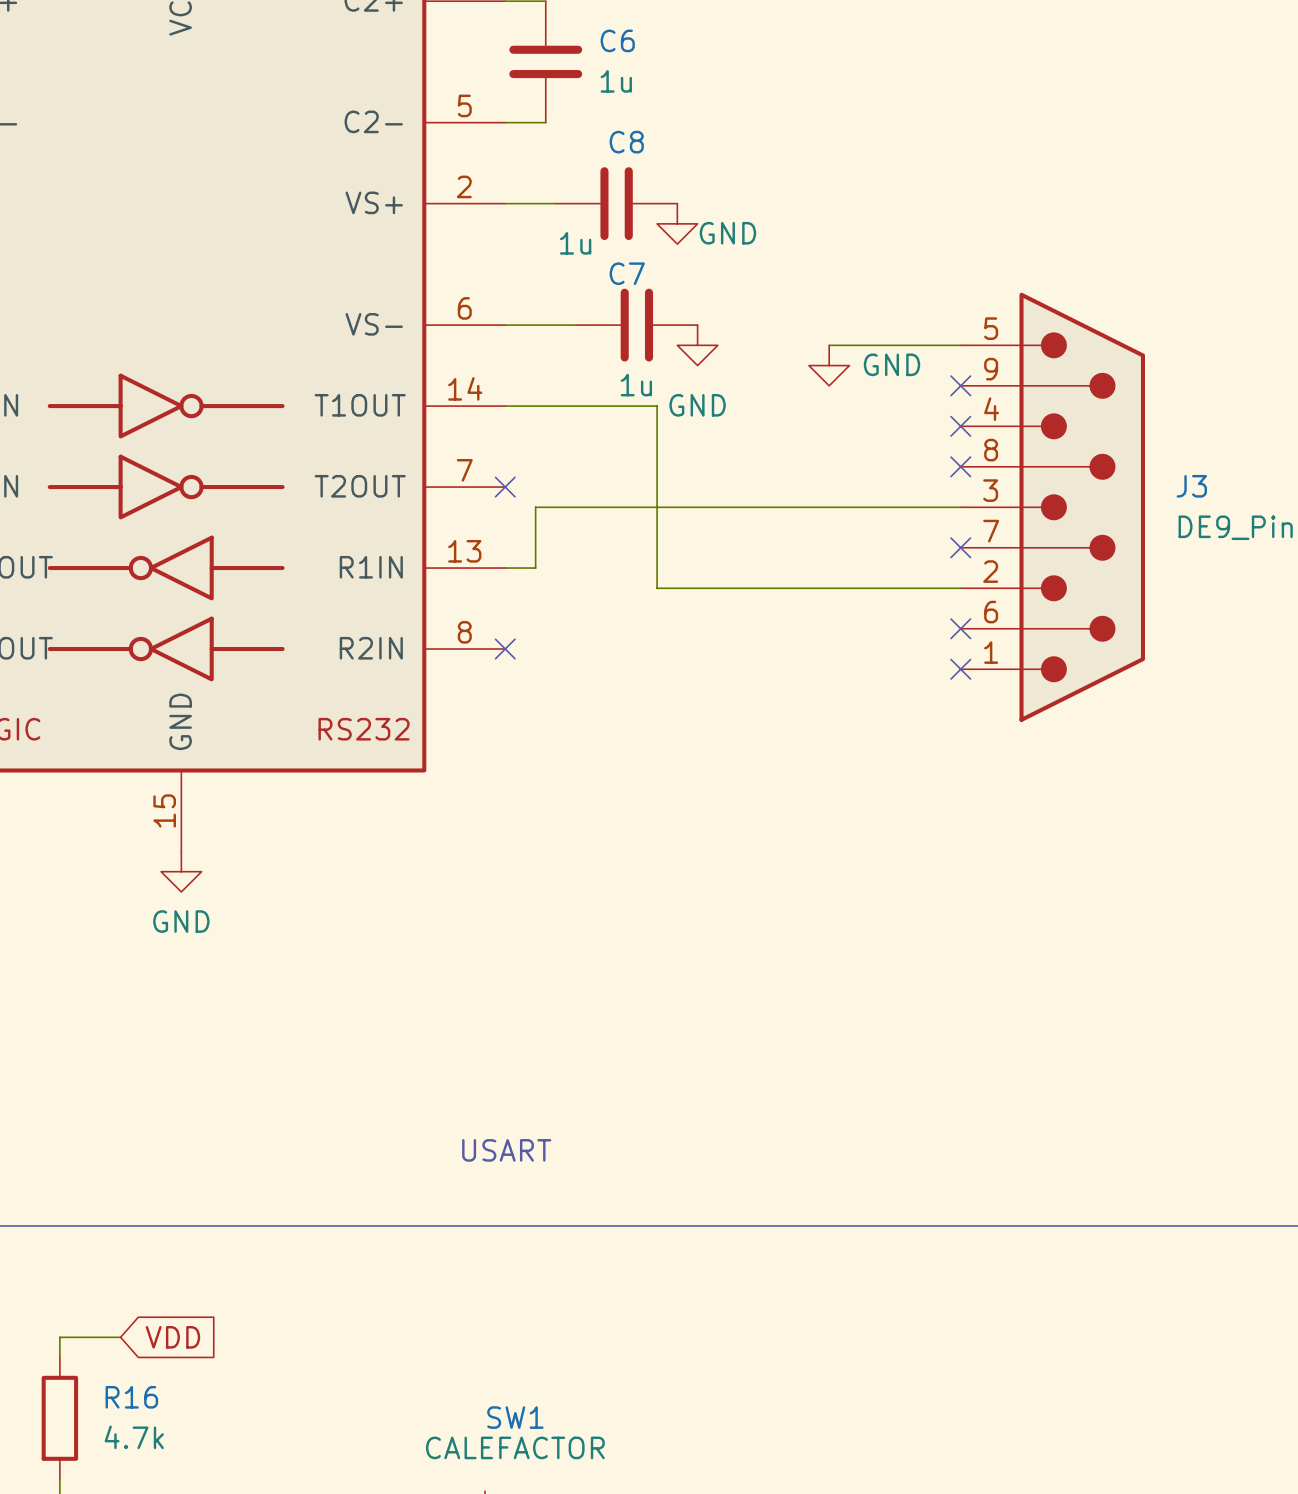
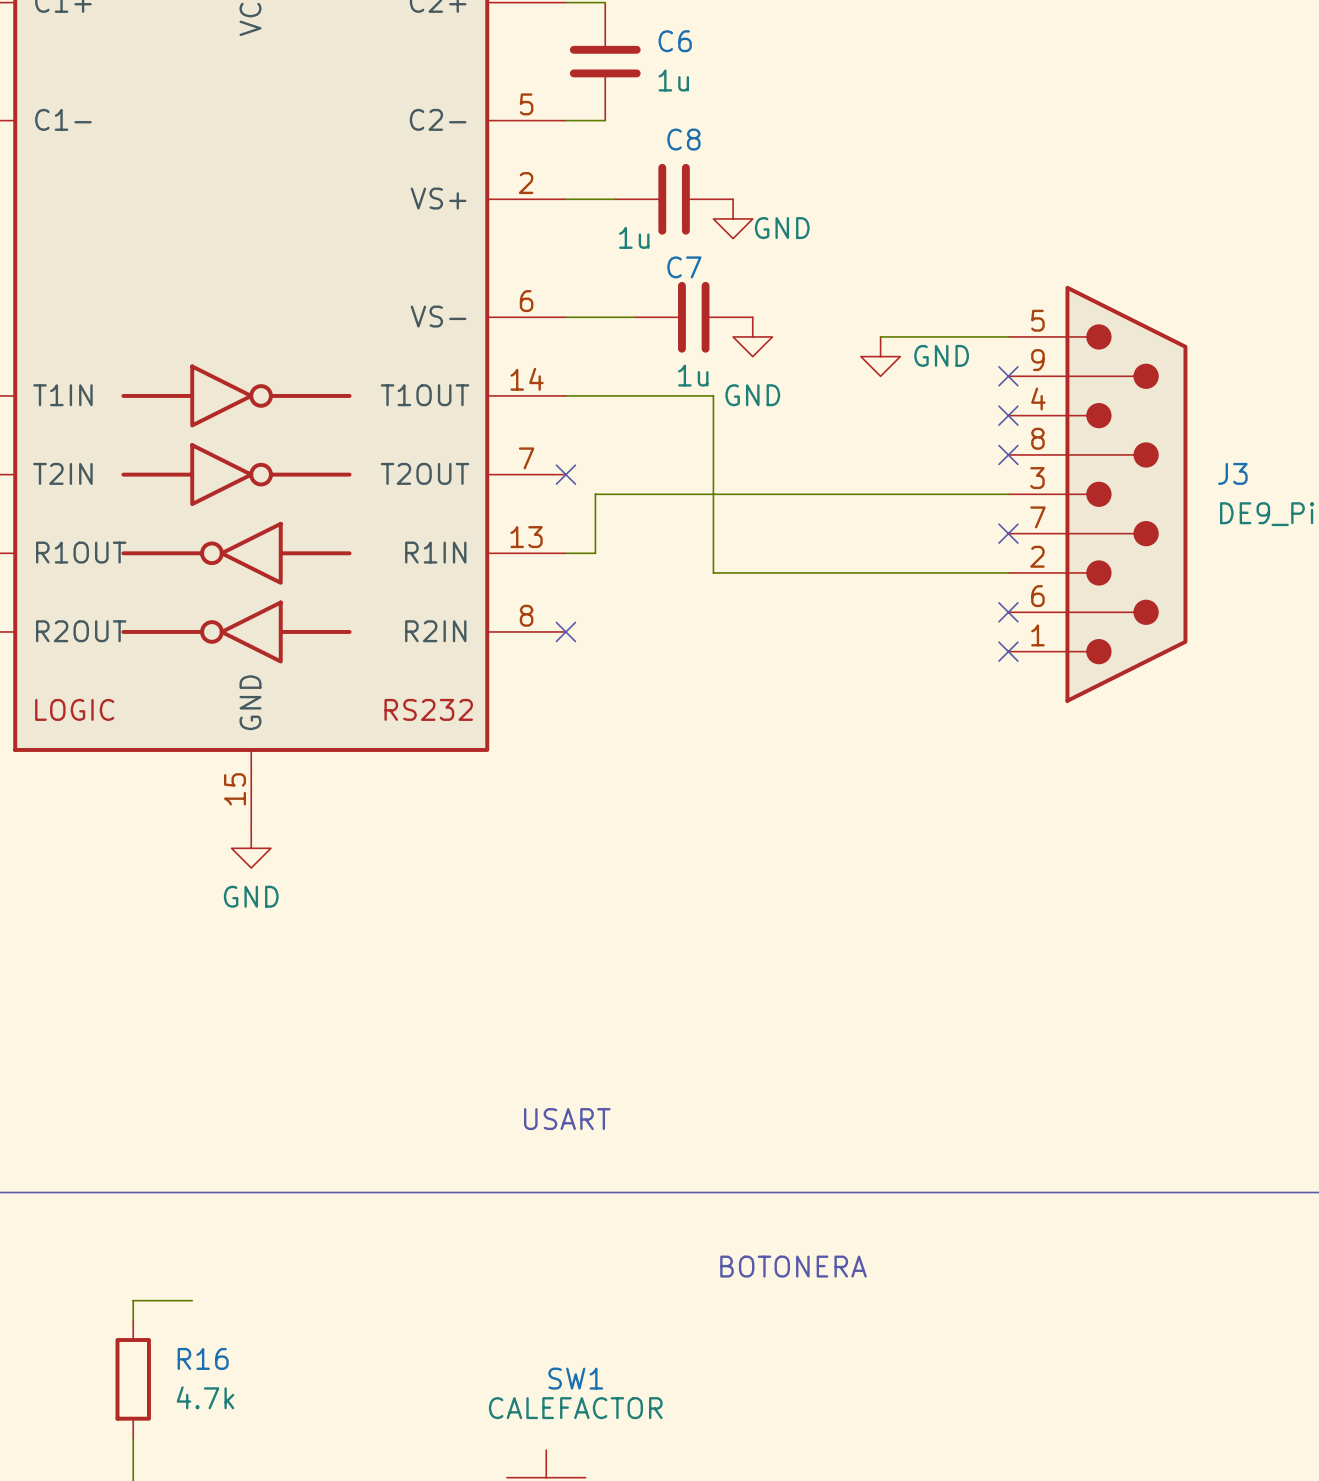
text: none -> BOTONERA (793, 1266)
global label: VDD (172, 1337) -> none

